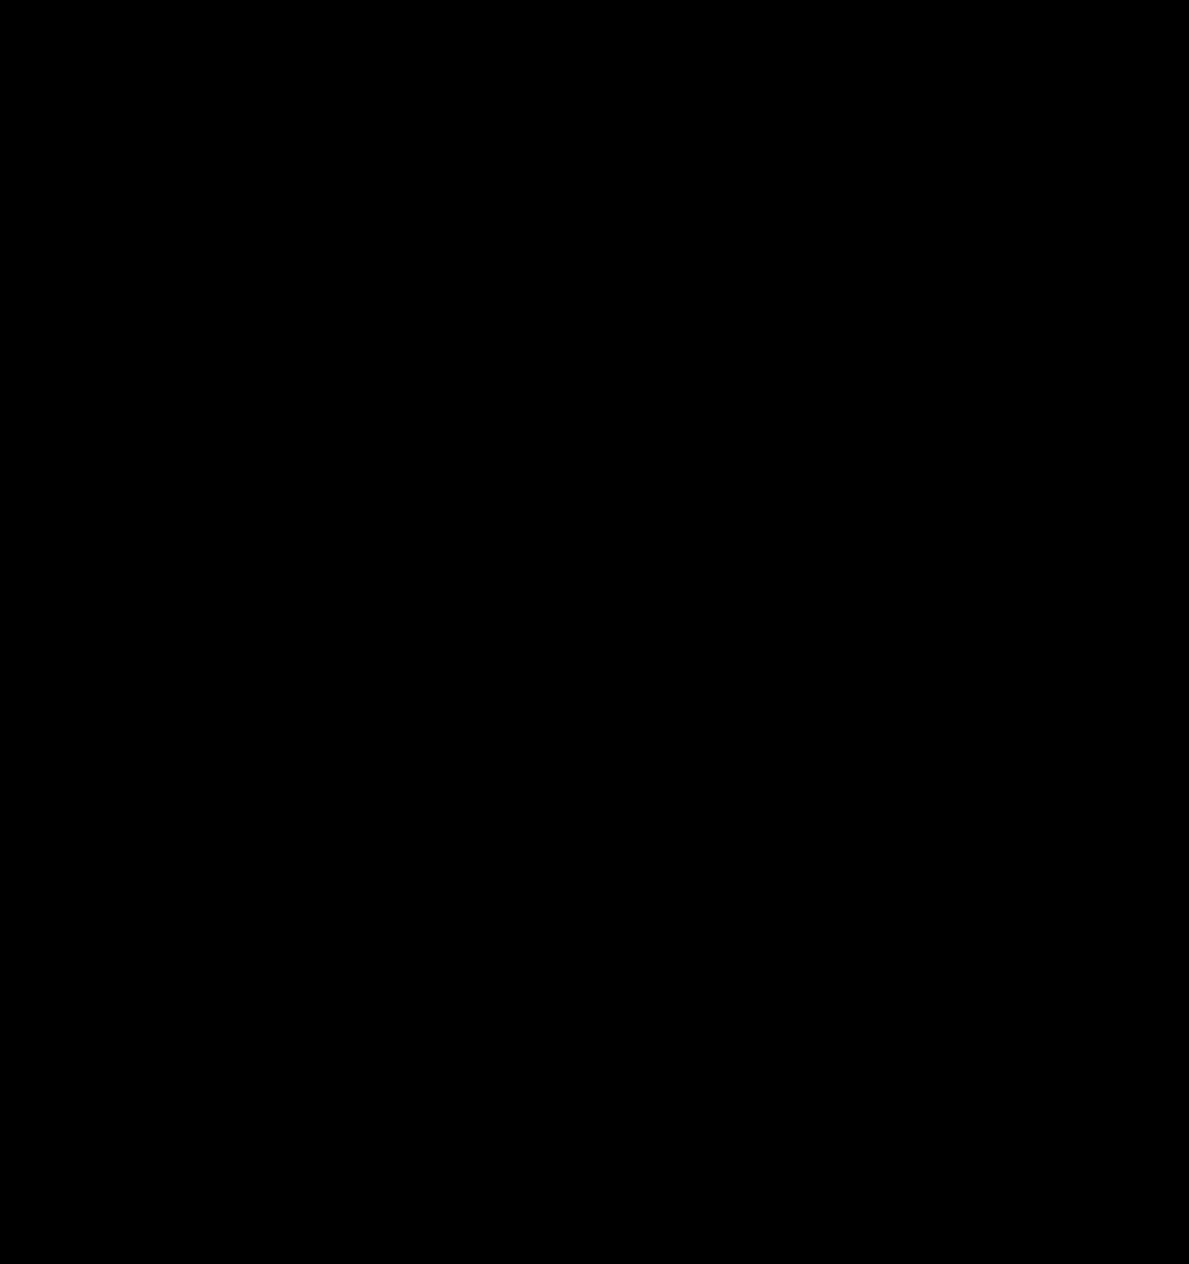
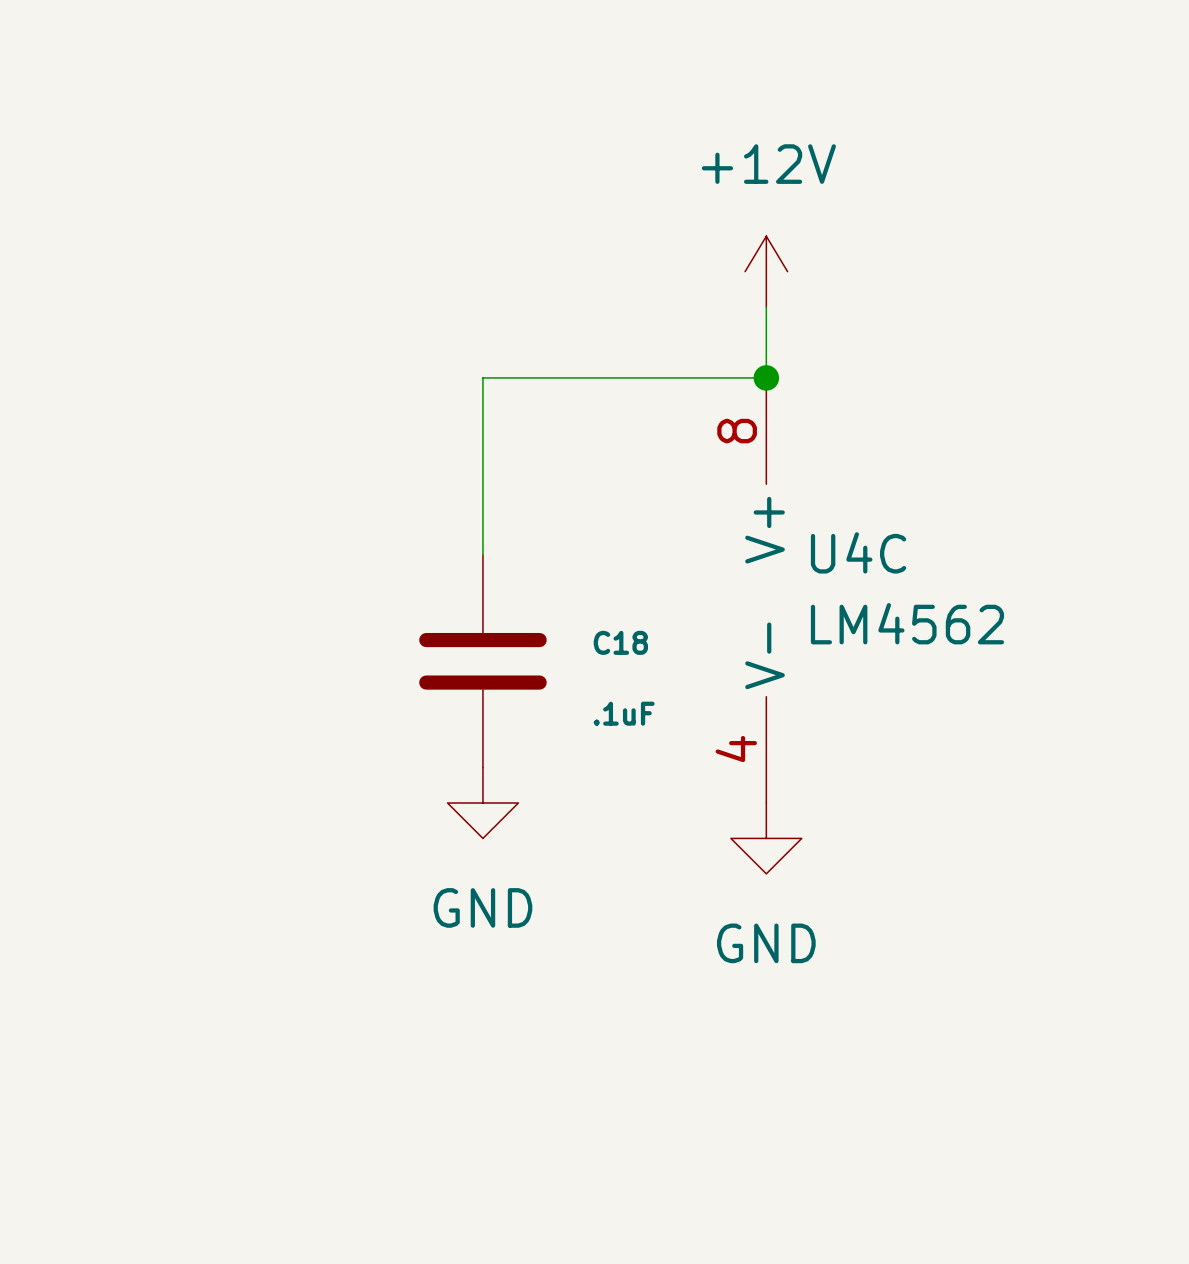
power symbol: none -> +12V (766, 271)
wire: none -> (766, 307) (766, 377) (482, 377) (482, 555)
junction: none -> (766, 377)
U4C: none -> LM4562 (766, 590)
C18: none -> .1uF (482, 661)
power symbol: none -> GND (482, 803)
power symbol: none -> GND (766, 838)

